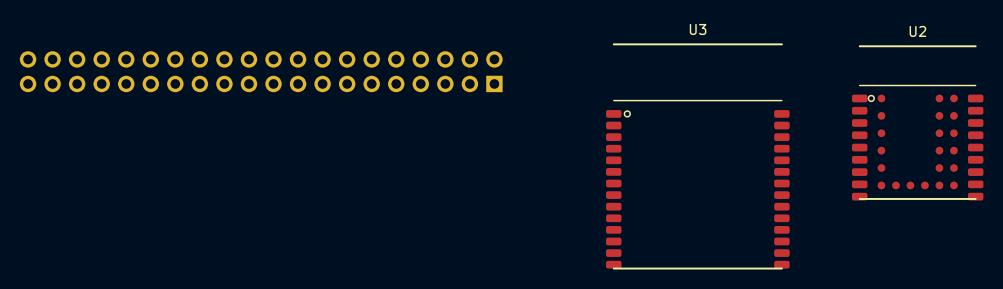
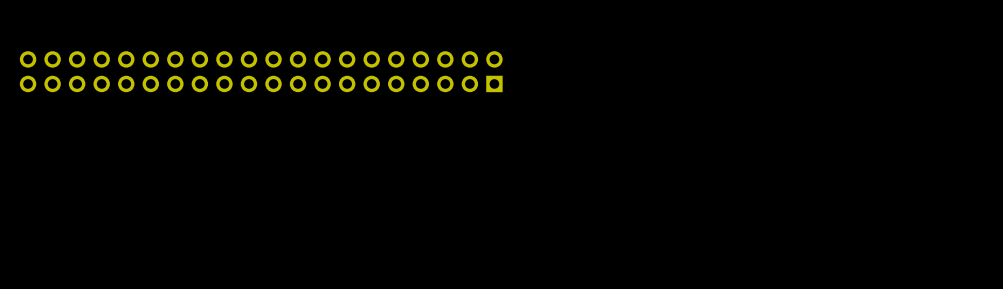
U2: (917, 122) -> none
U3: (697, 156) -> none

